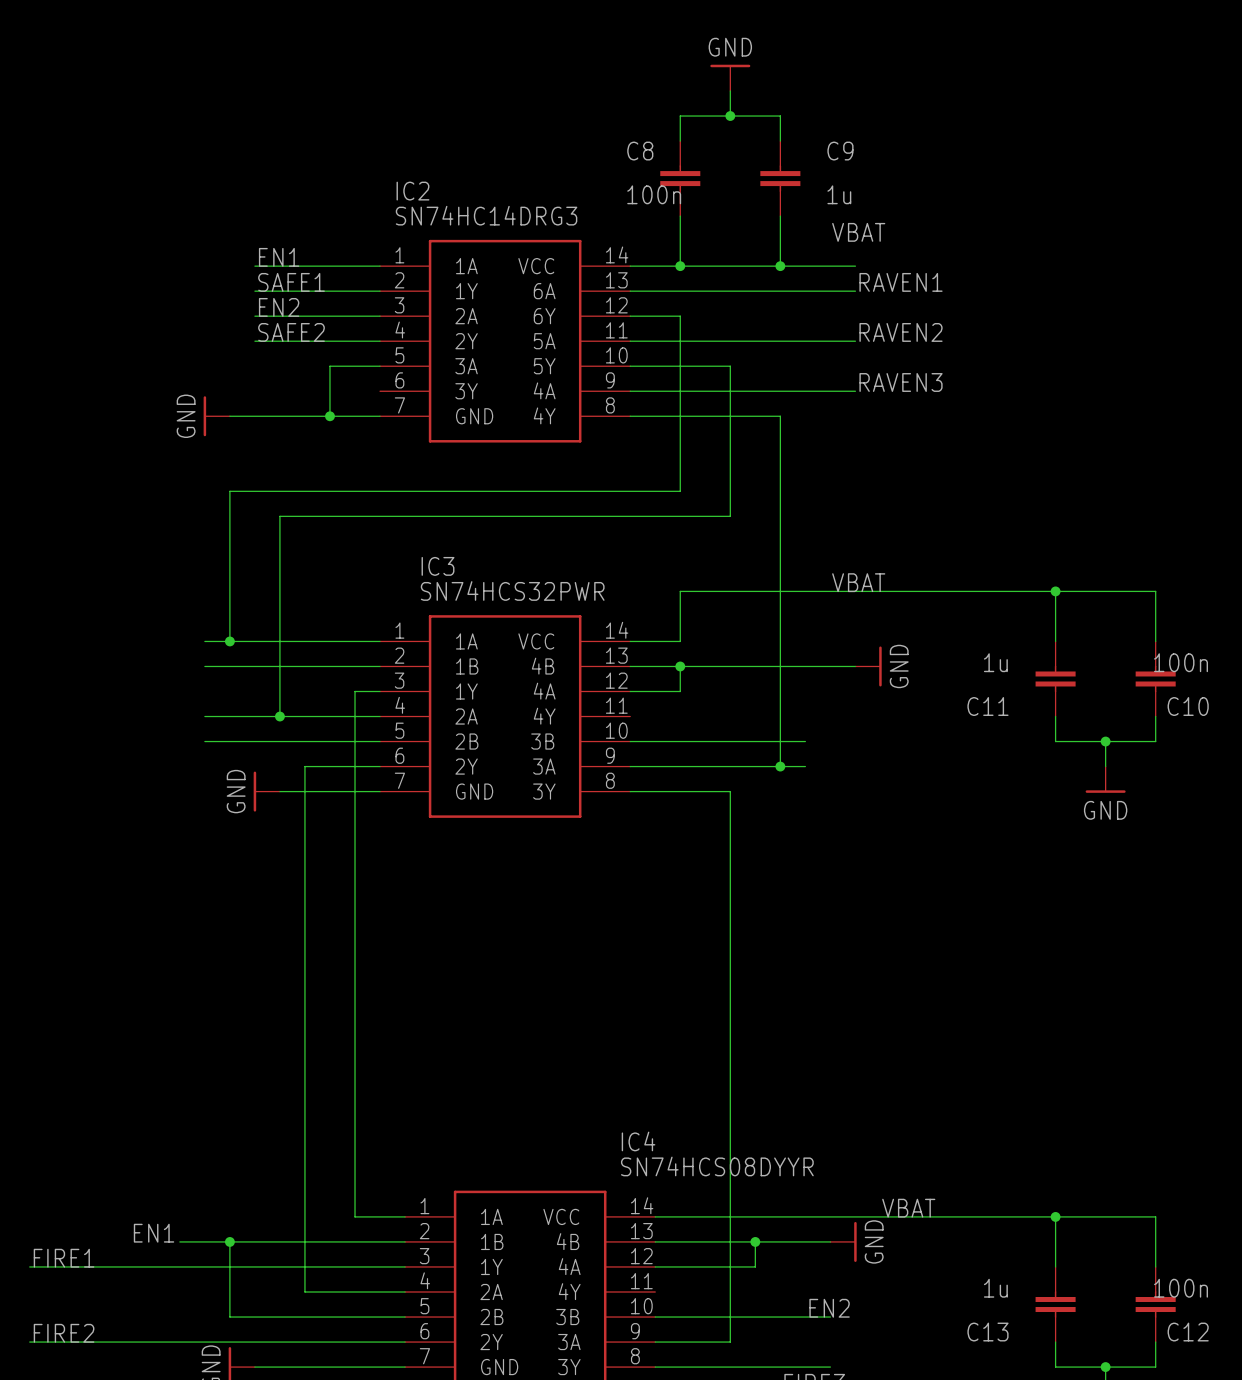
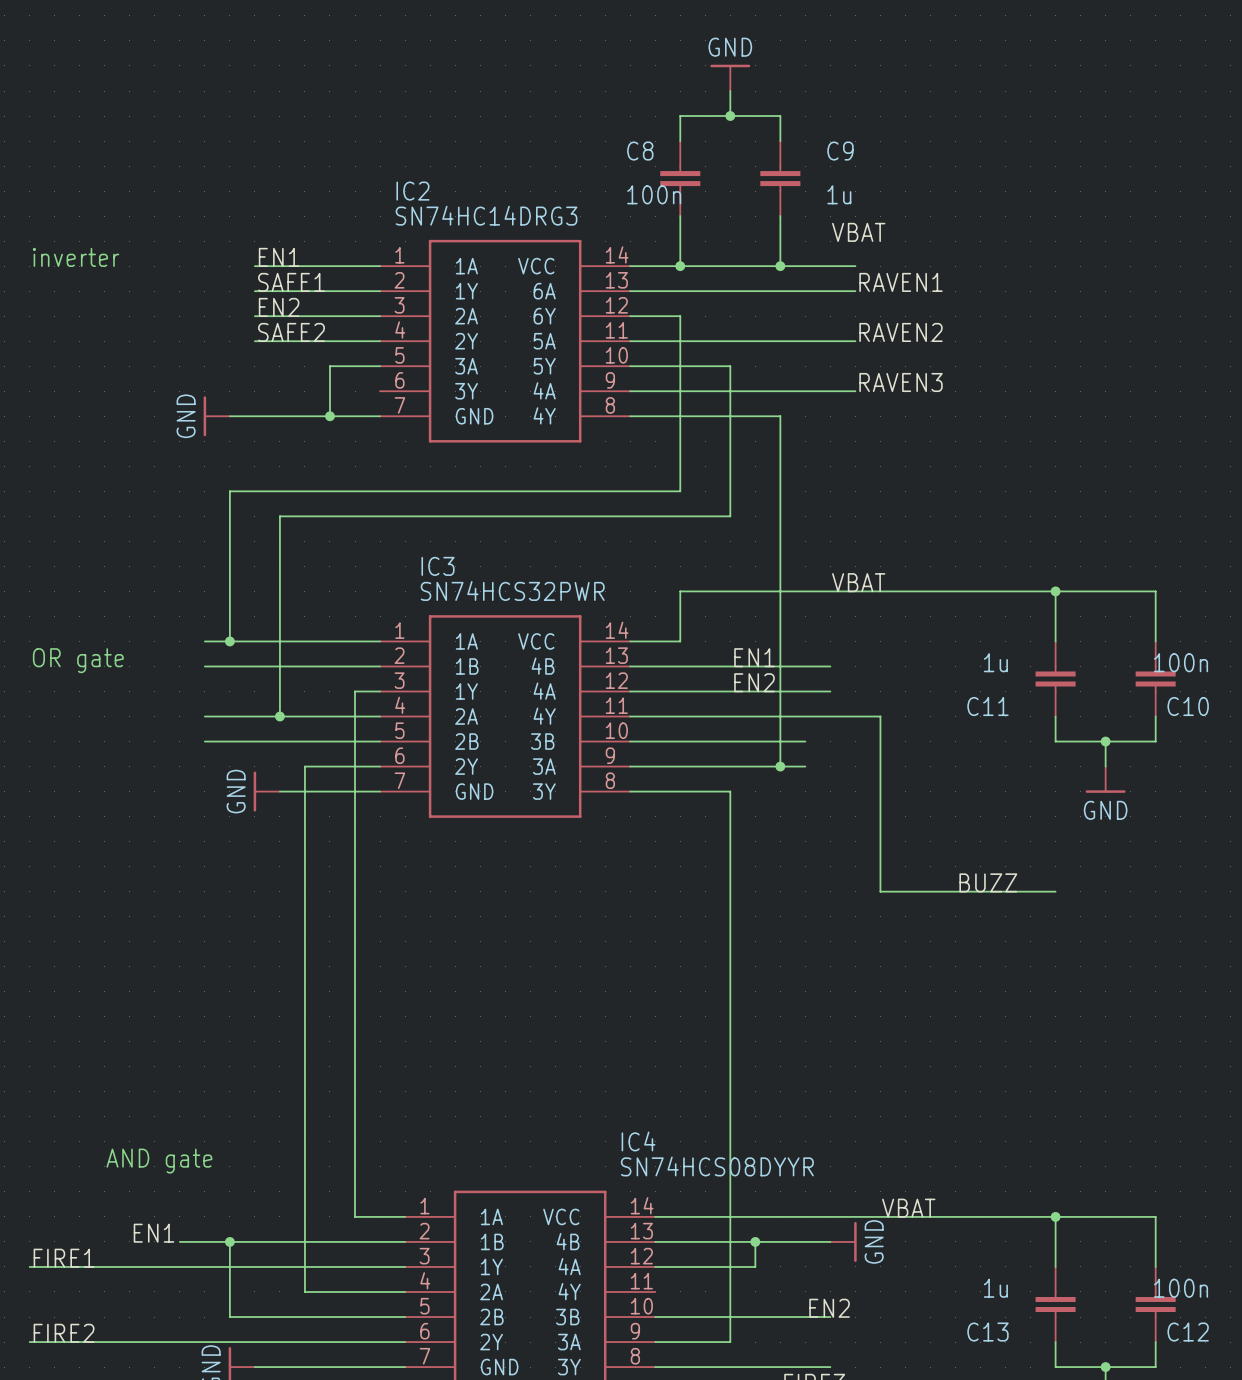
text: none -> inverter (76, 257)
label: none -> EN1 (754, 657)
text: none -> OR gate (78, 660)
wire: (680, 666) (680, 691) -> (830, 691) (680, 691)
junction: (680, 666) -> none
wire: (830, 666) (855, 666) -> none
power symbol: GND (868, 666) -> none
label: none -> EN2 (754, 682)
wire: none -> (630, 716) (880, 716) (880, 891) (1055, 891)
label: none -> BUZZ (988, 882)
text: none -> AND gate (159, 1161)

